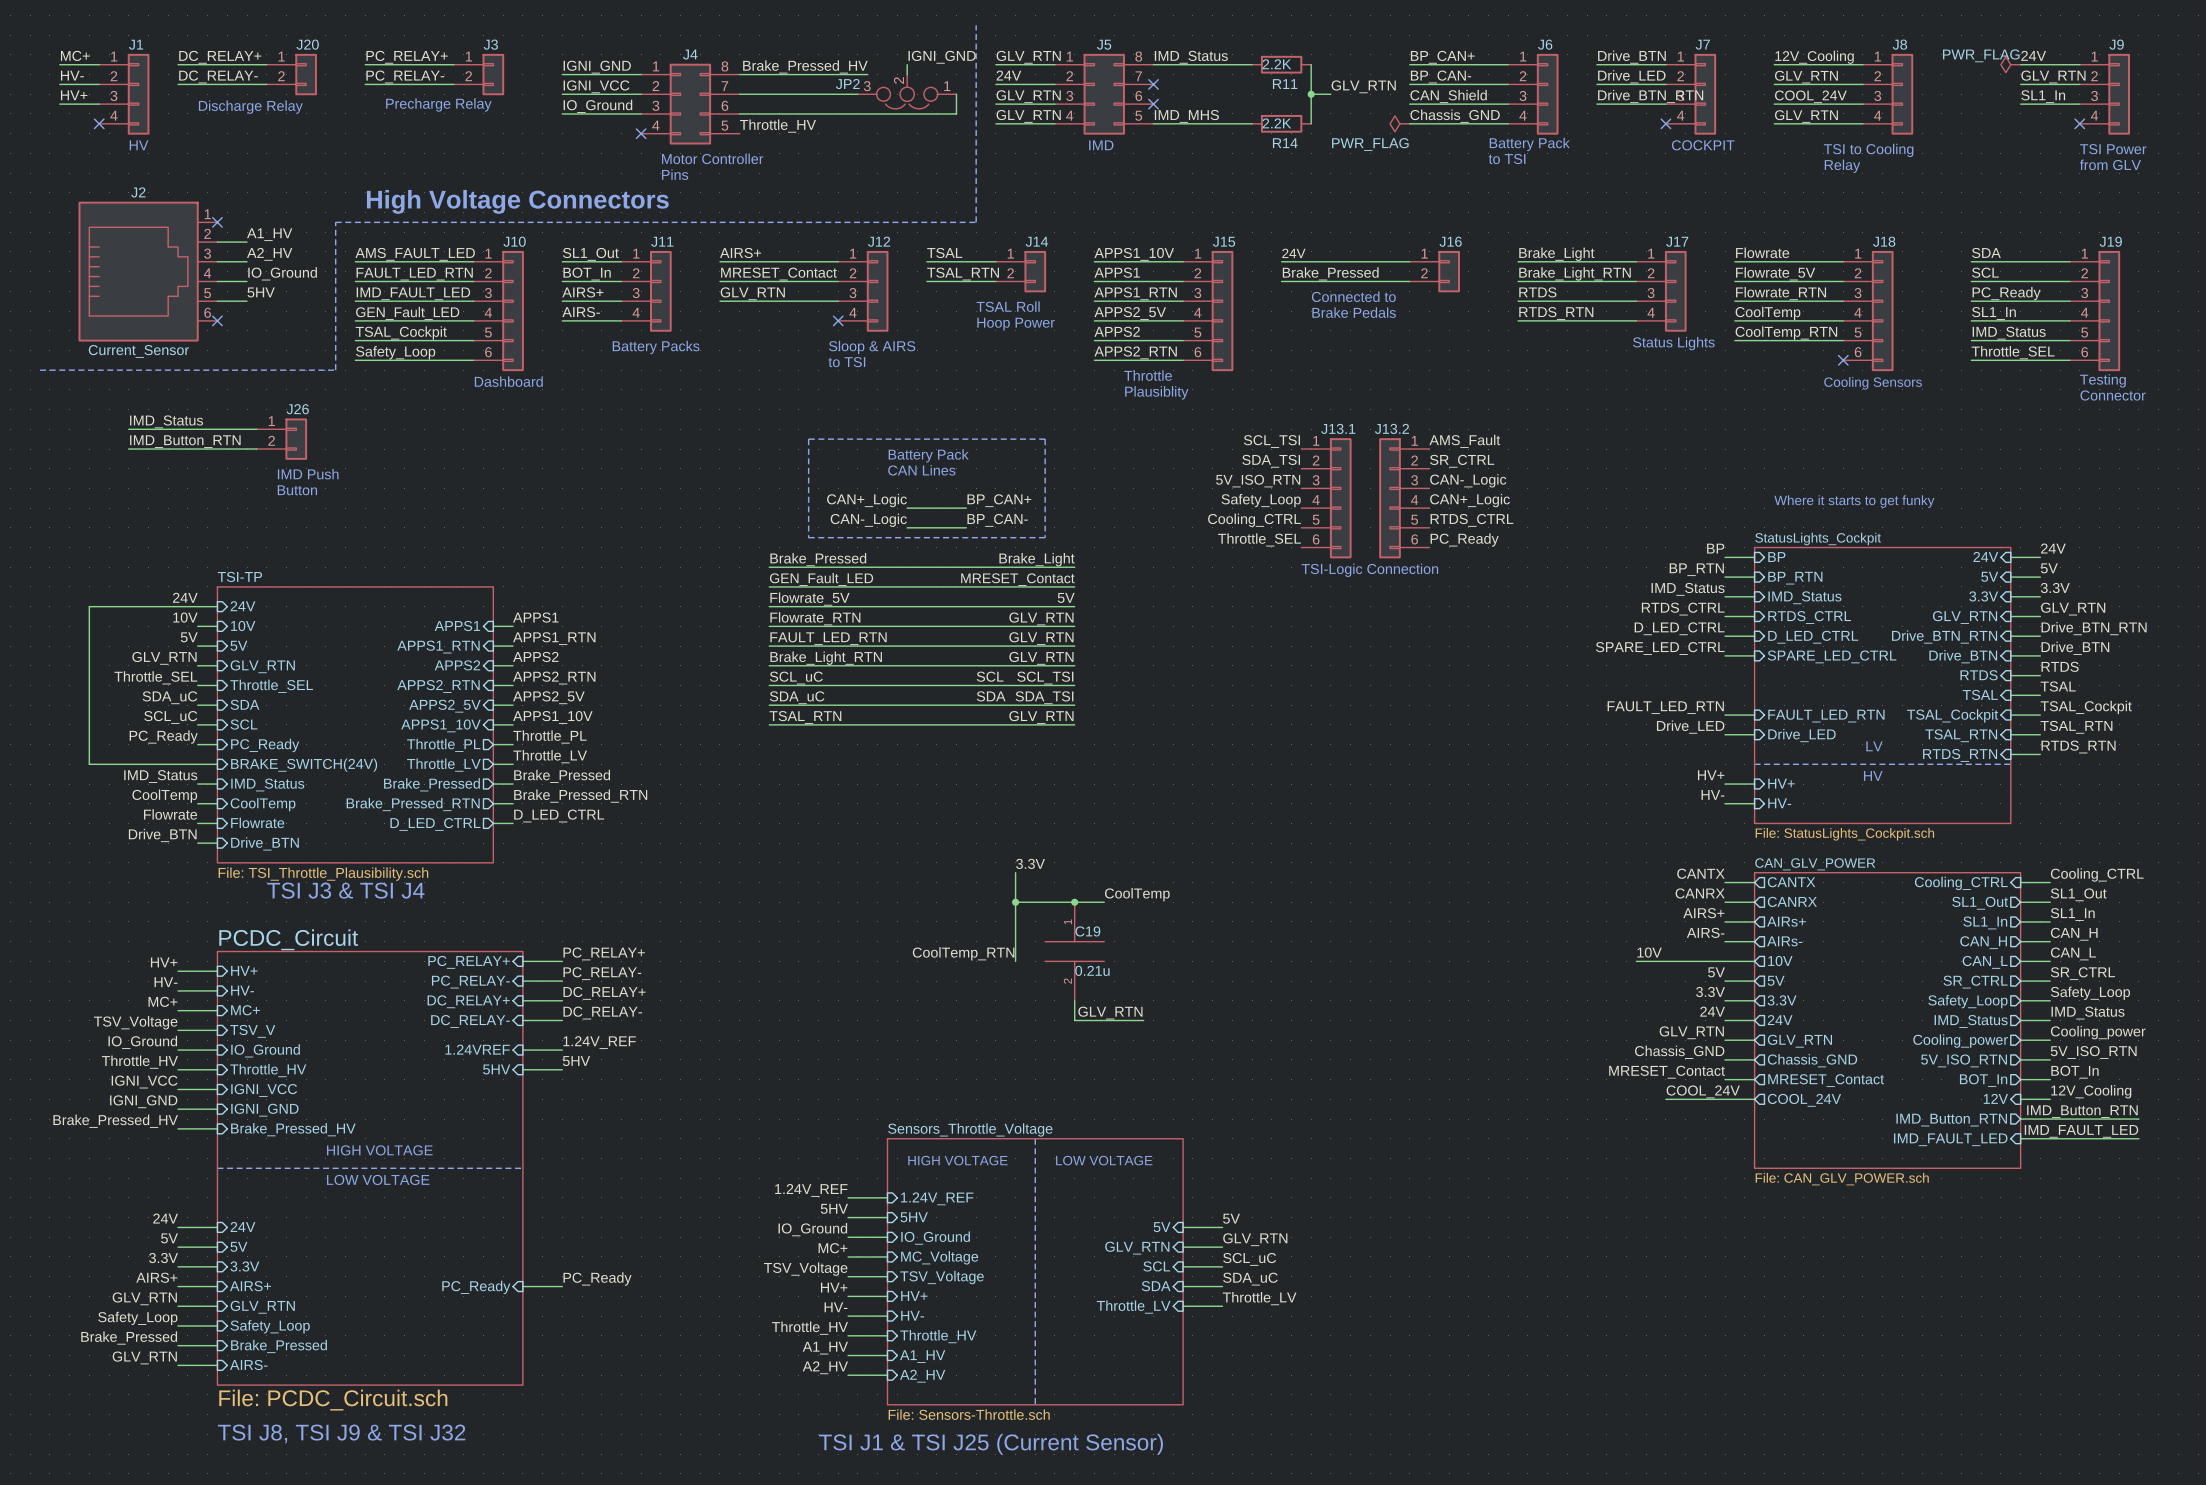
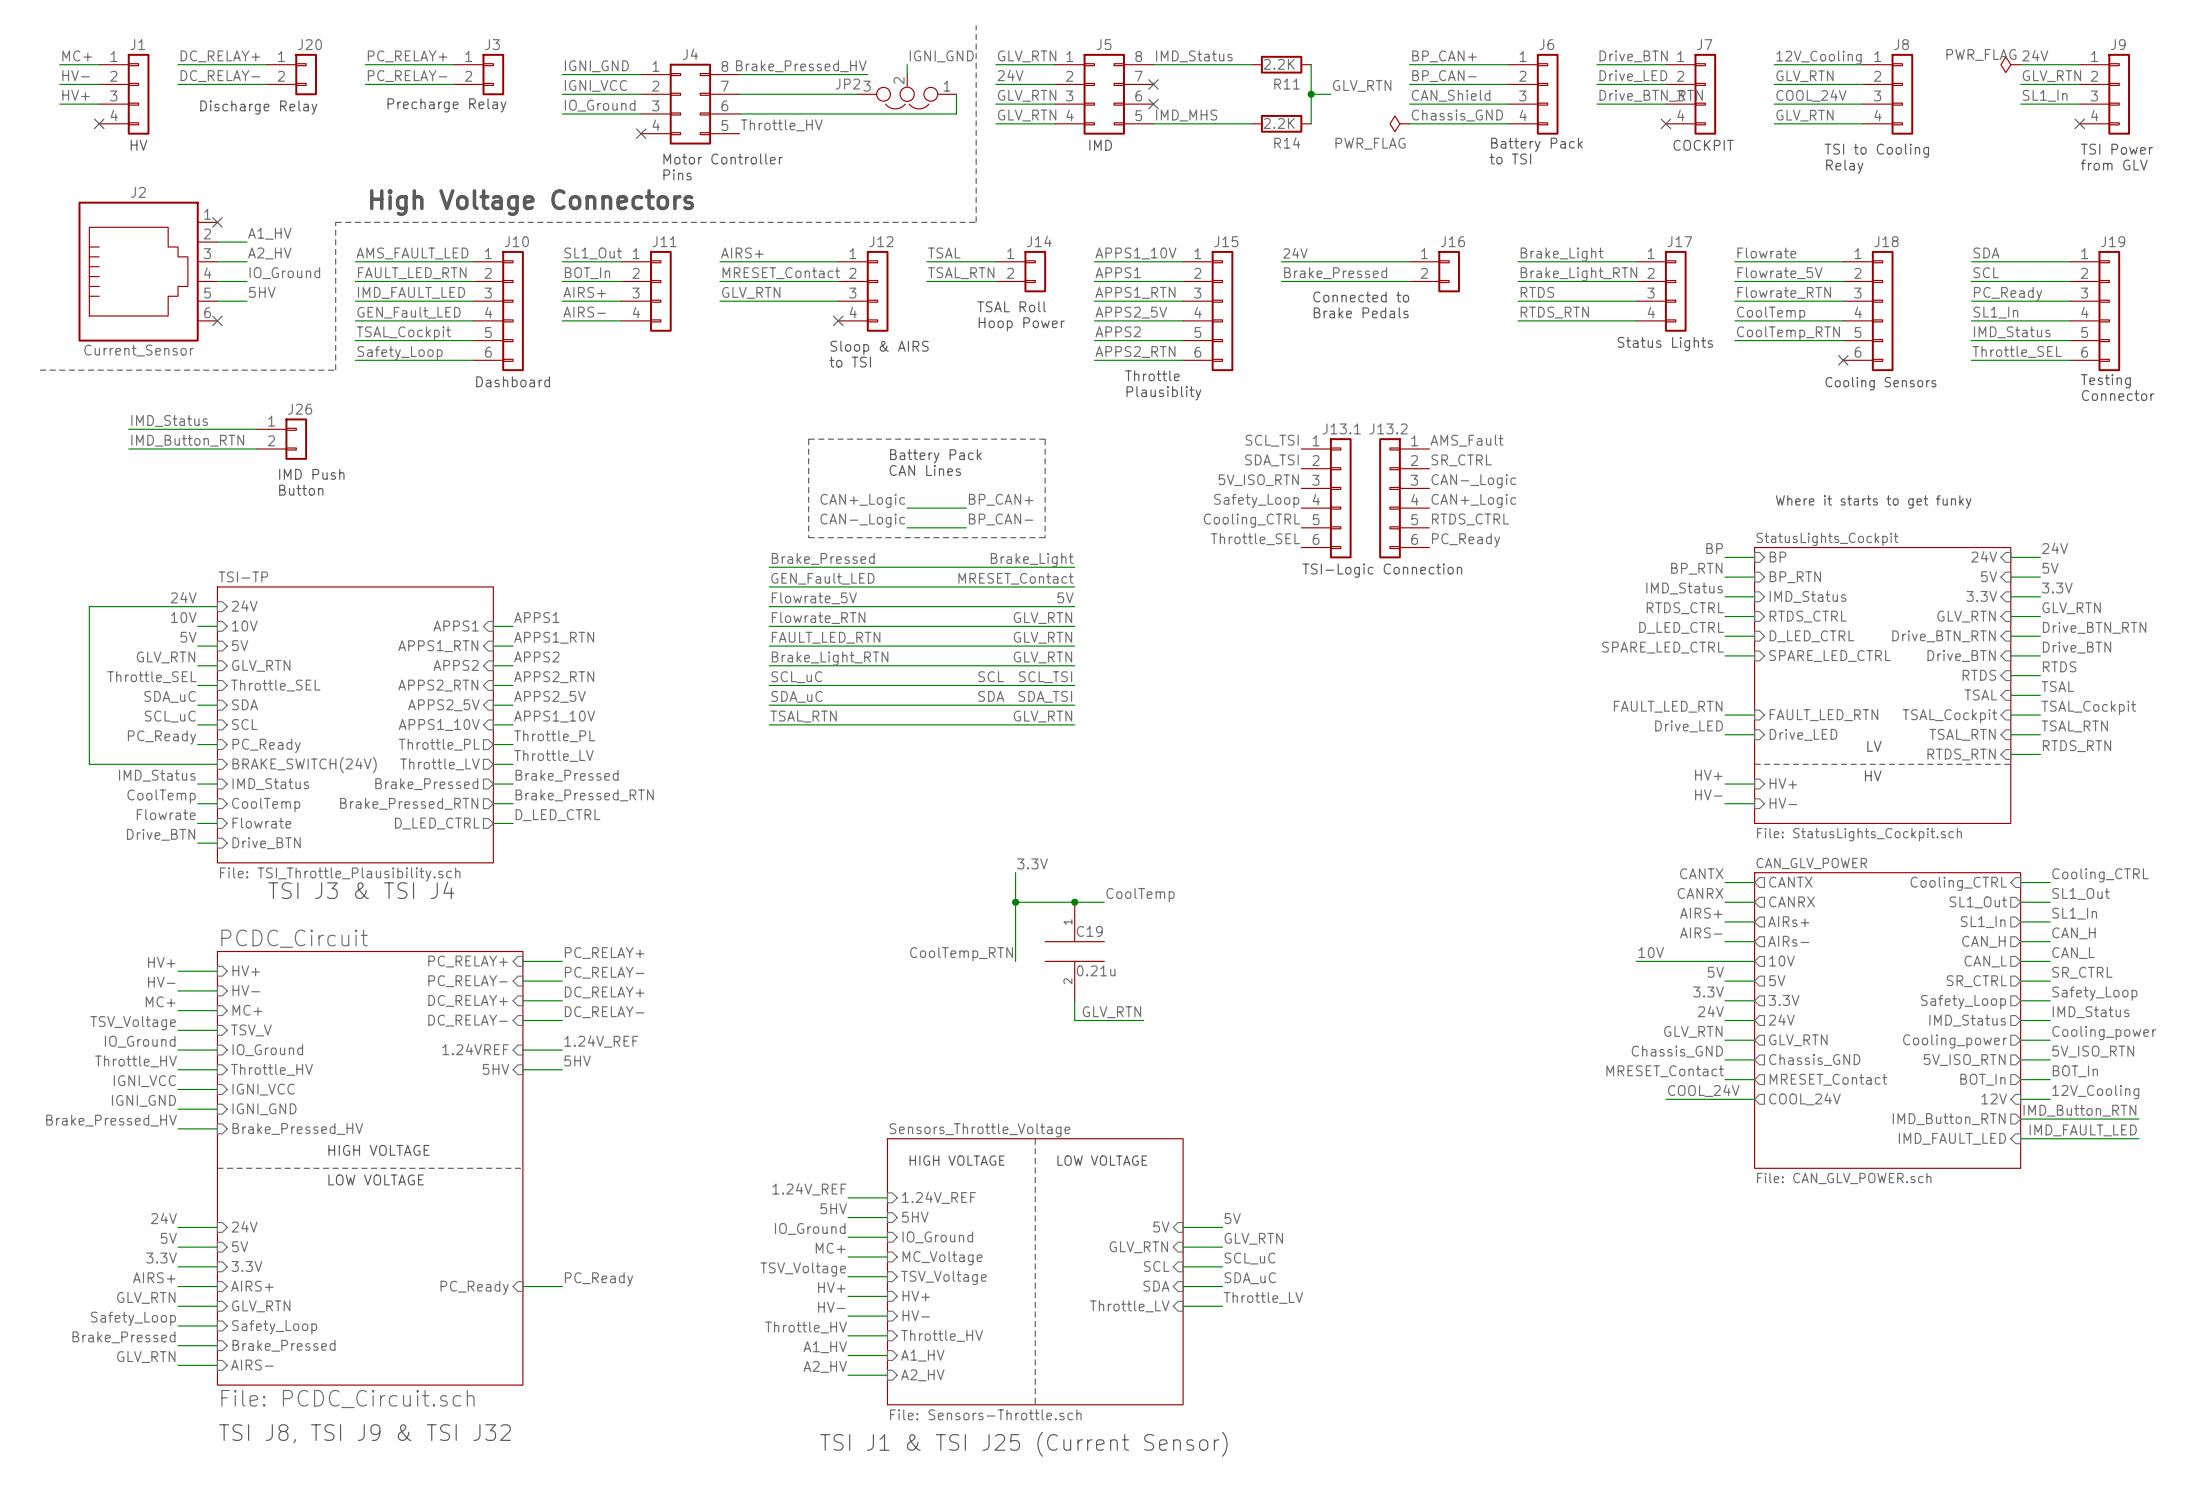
text: Battery Packs (656, 347) -> none

